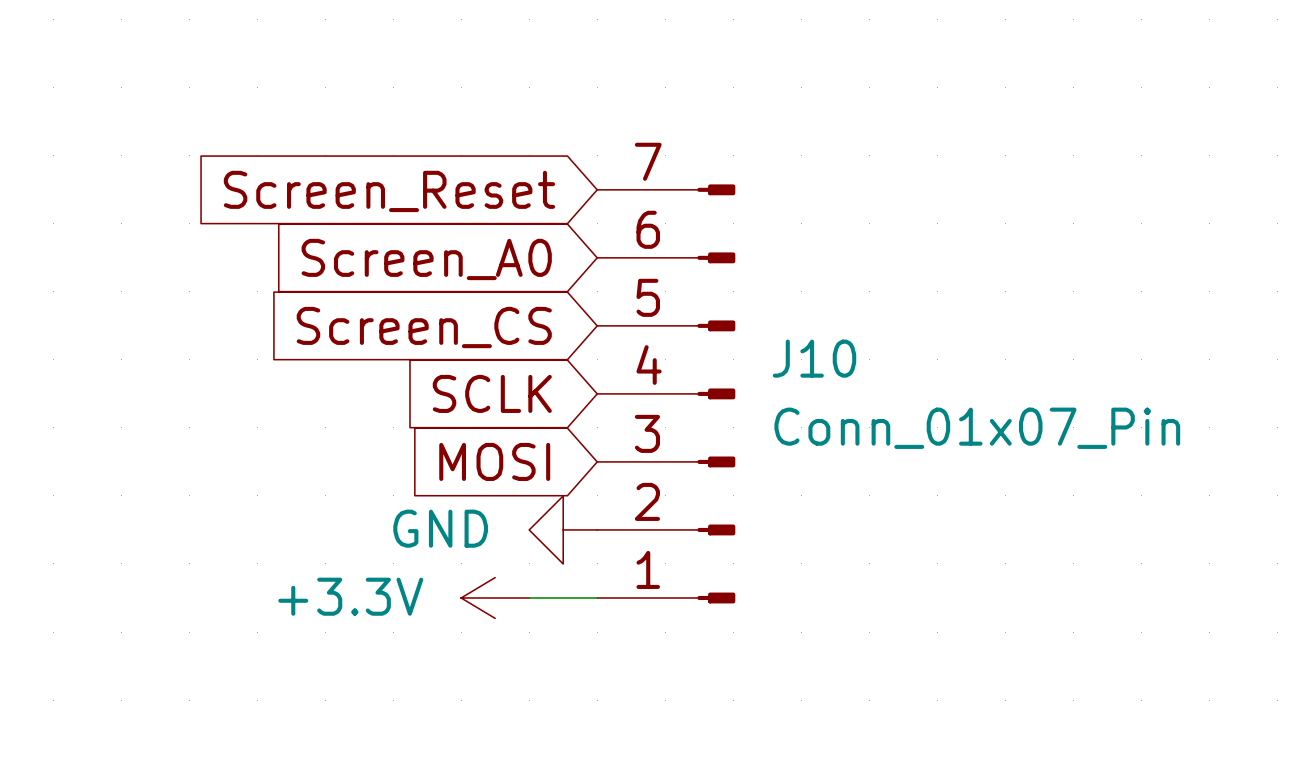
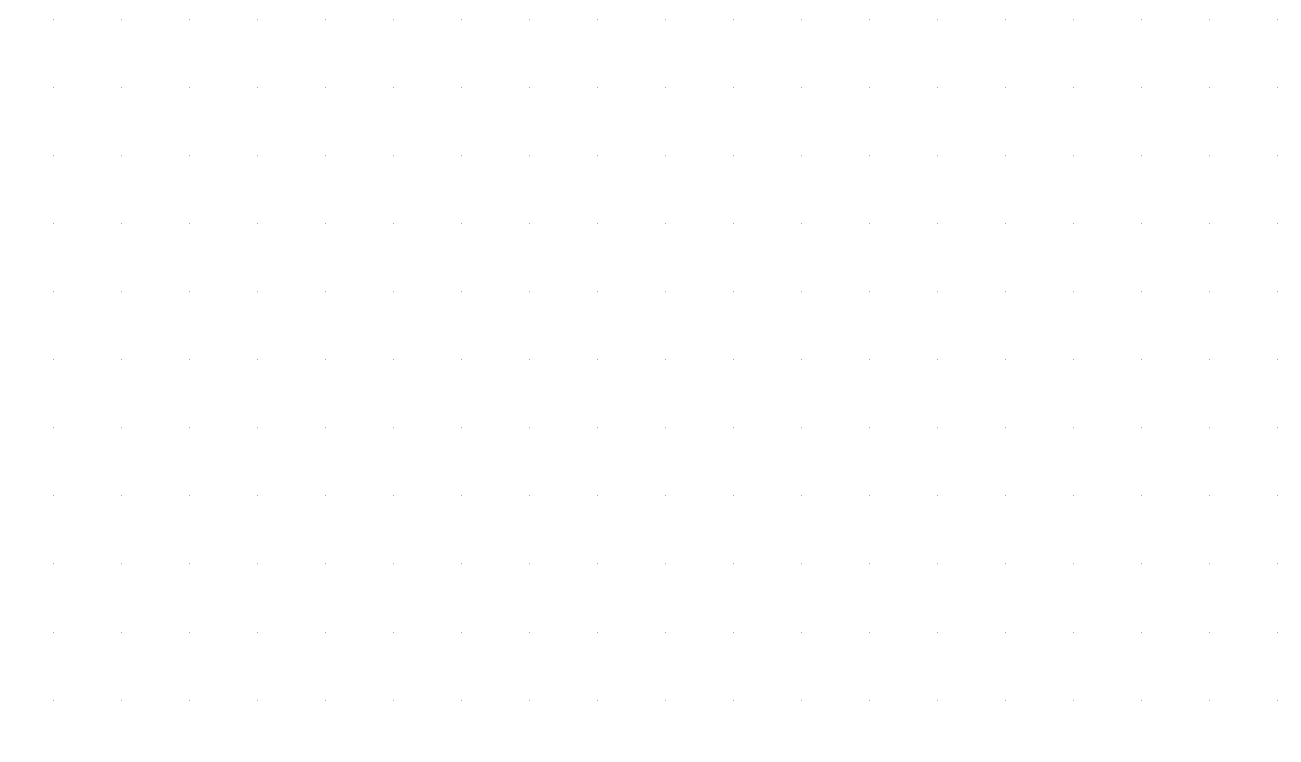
global label: Screen_Reset (389, 191) -> none
global label: Screen_A0 (426, 259) -> none
global label: Screen_CS (424, 327) -> none
global label: SCLK (492, 393) -> none
J10: Conn_01x07_Pin (666, 393) -> none
global label: MOSI (494, 461) -> none
power symbol: GND (563, 529) -> none
power symbol: +3.3V (495, 597) -> none
wire: (529, 597) (597, 597) -> none

